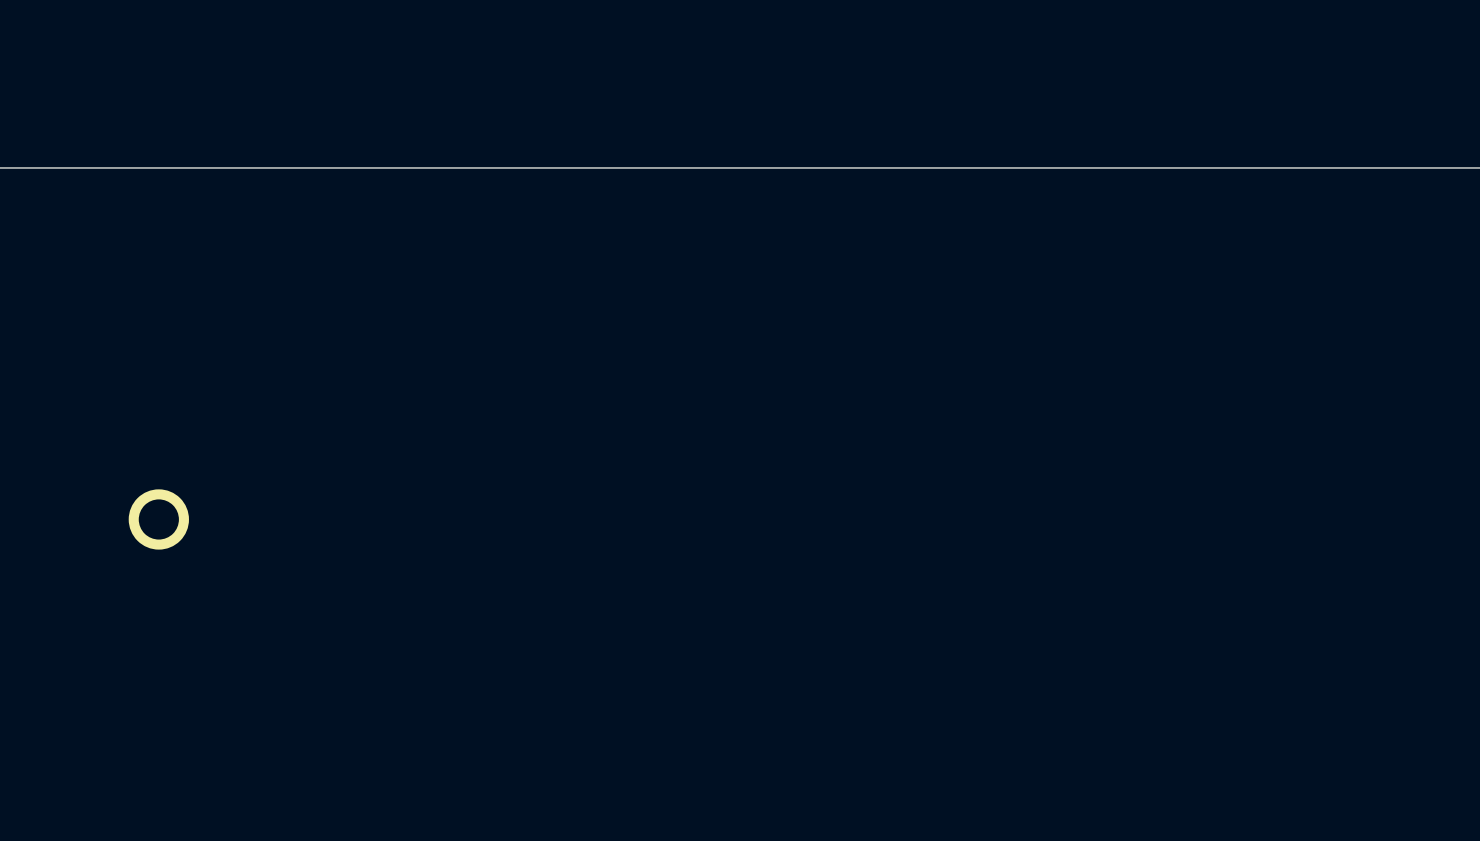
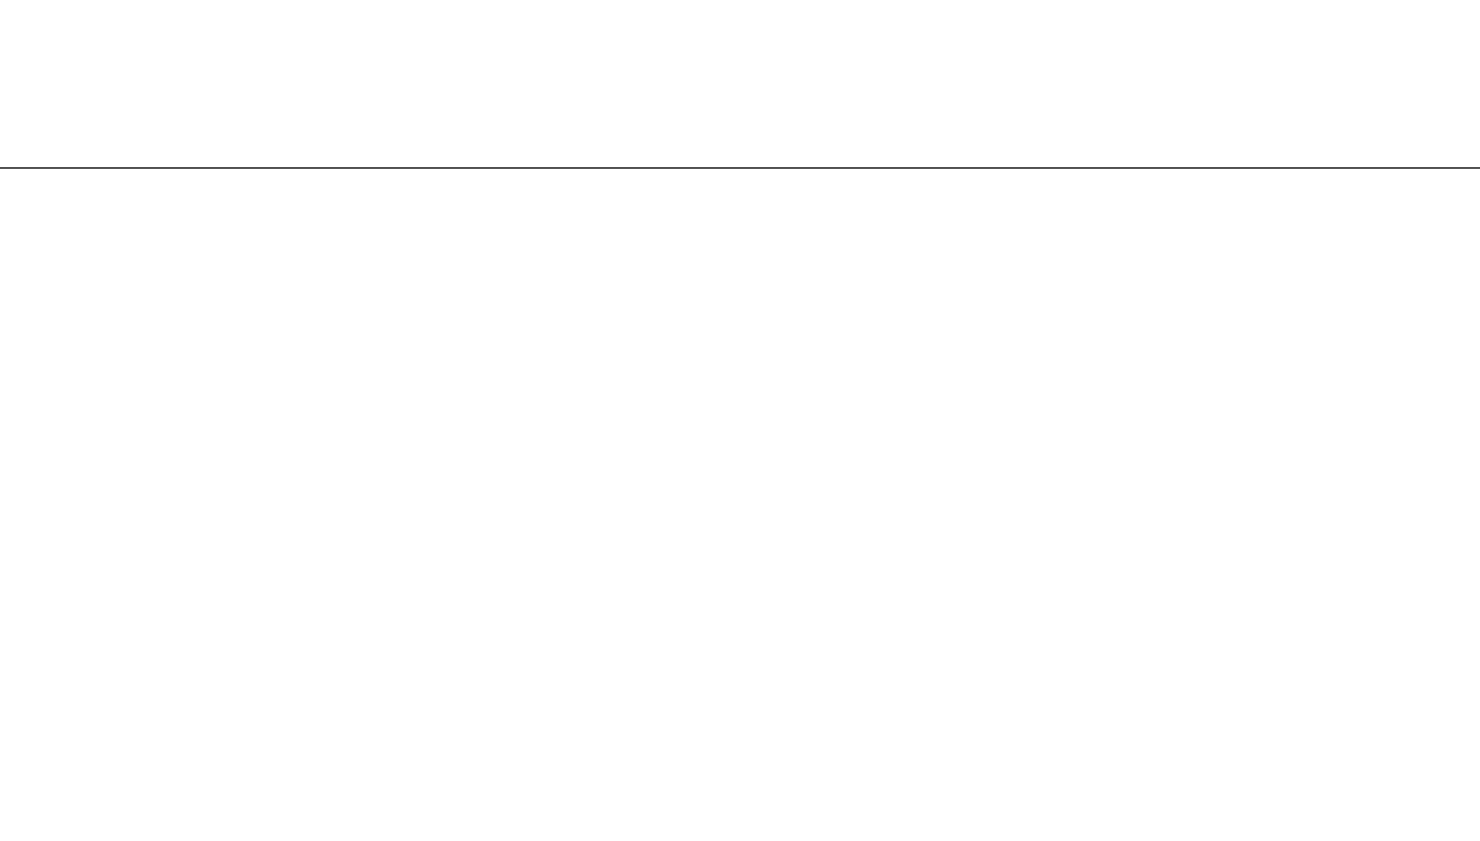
part: (158, 519) -> none

